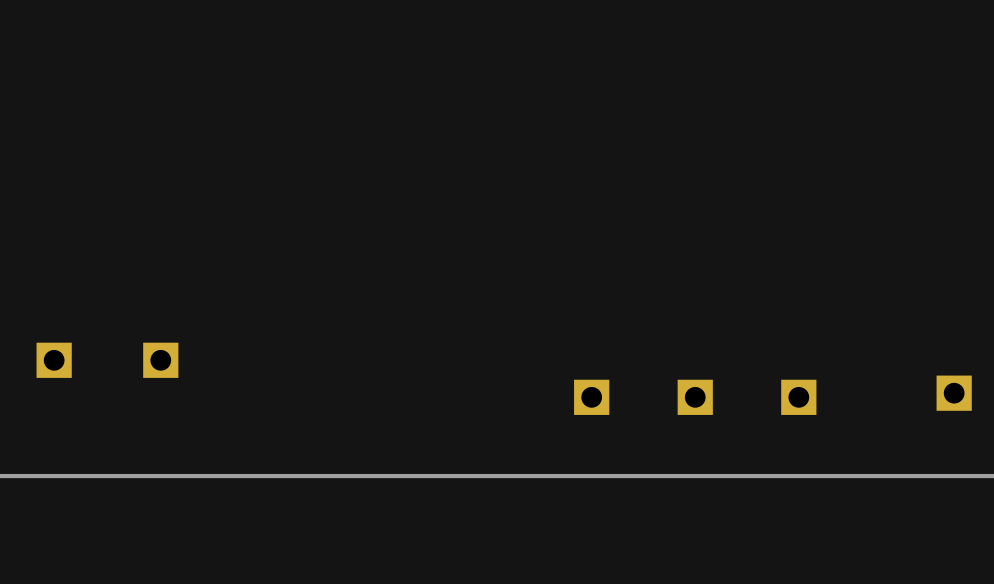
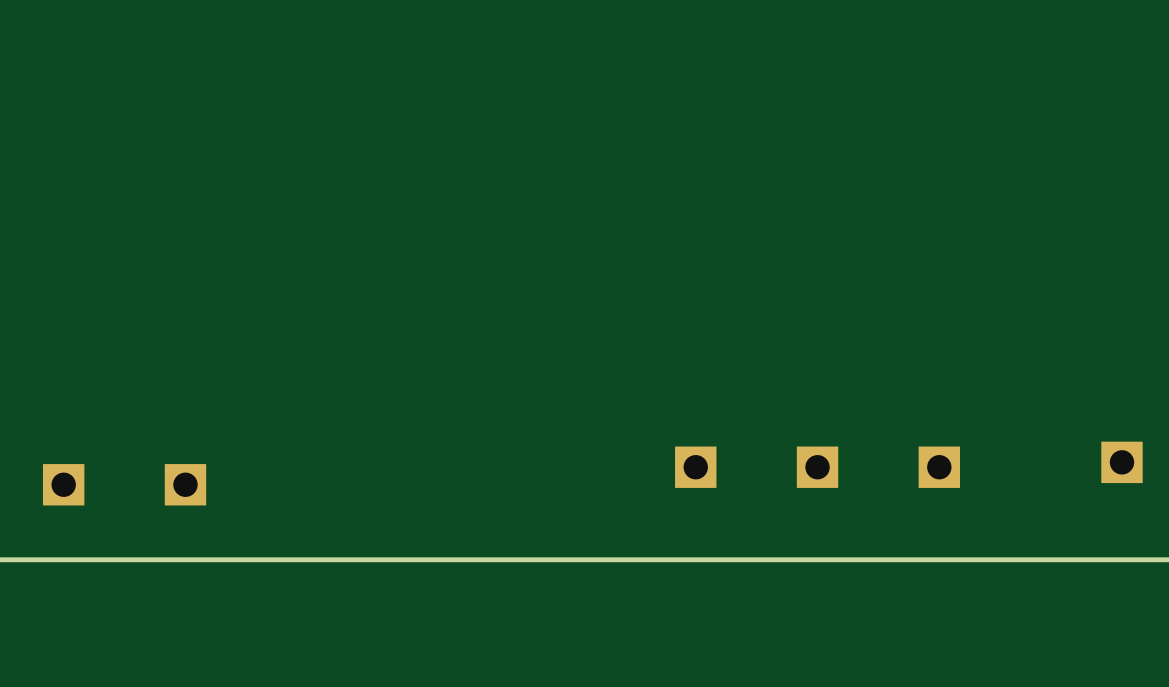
part position: (54, 360) -> (63, 484)
part position: (160, 360) -> (185, 484)

